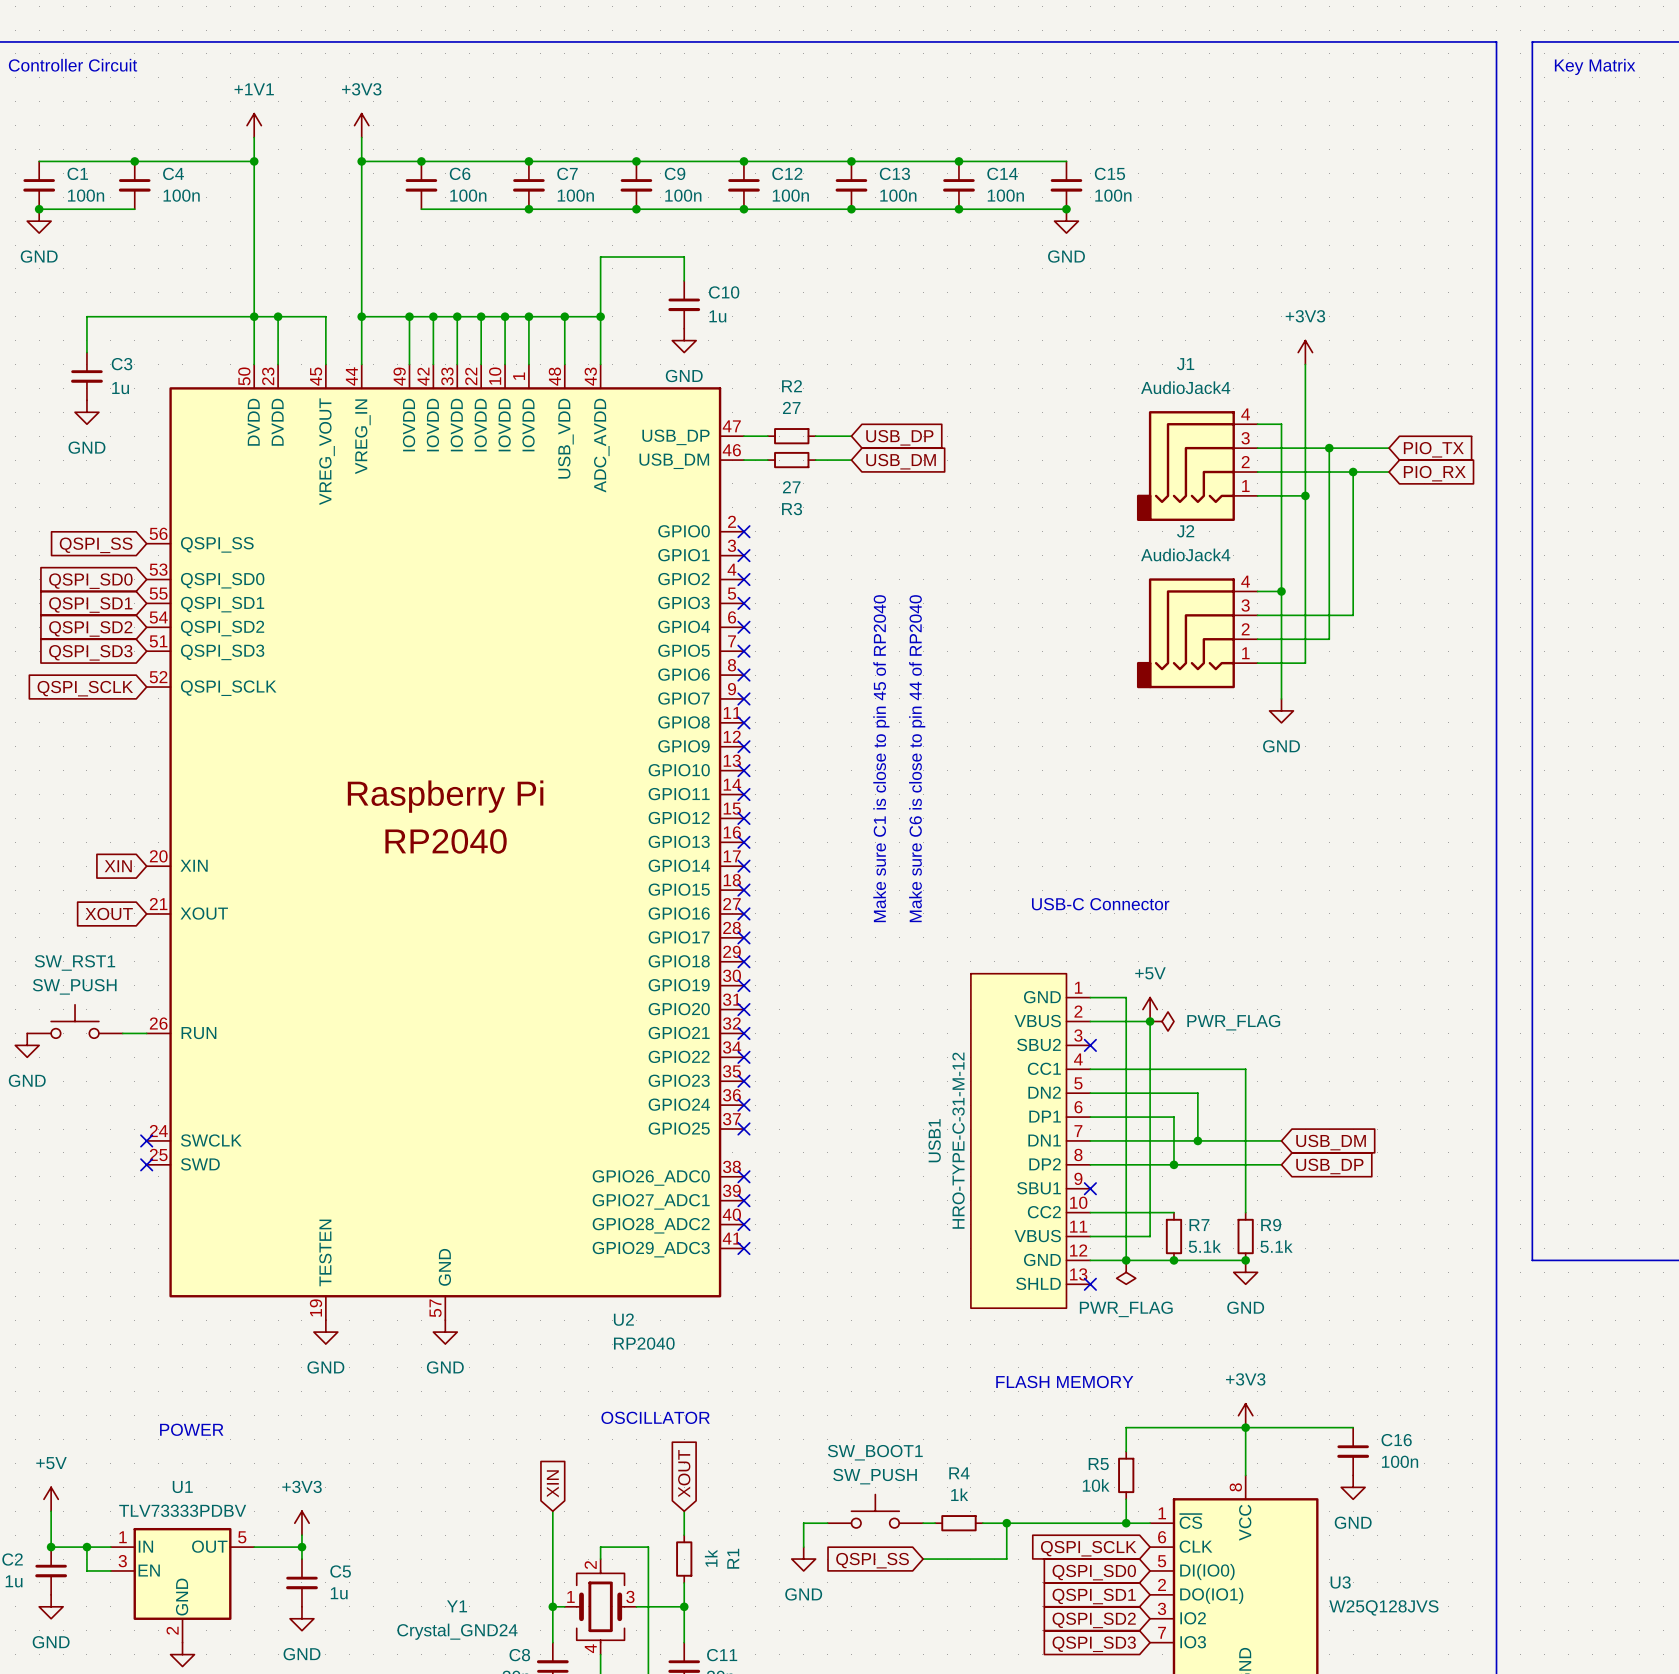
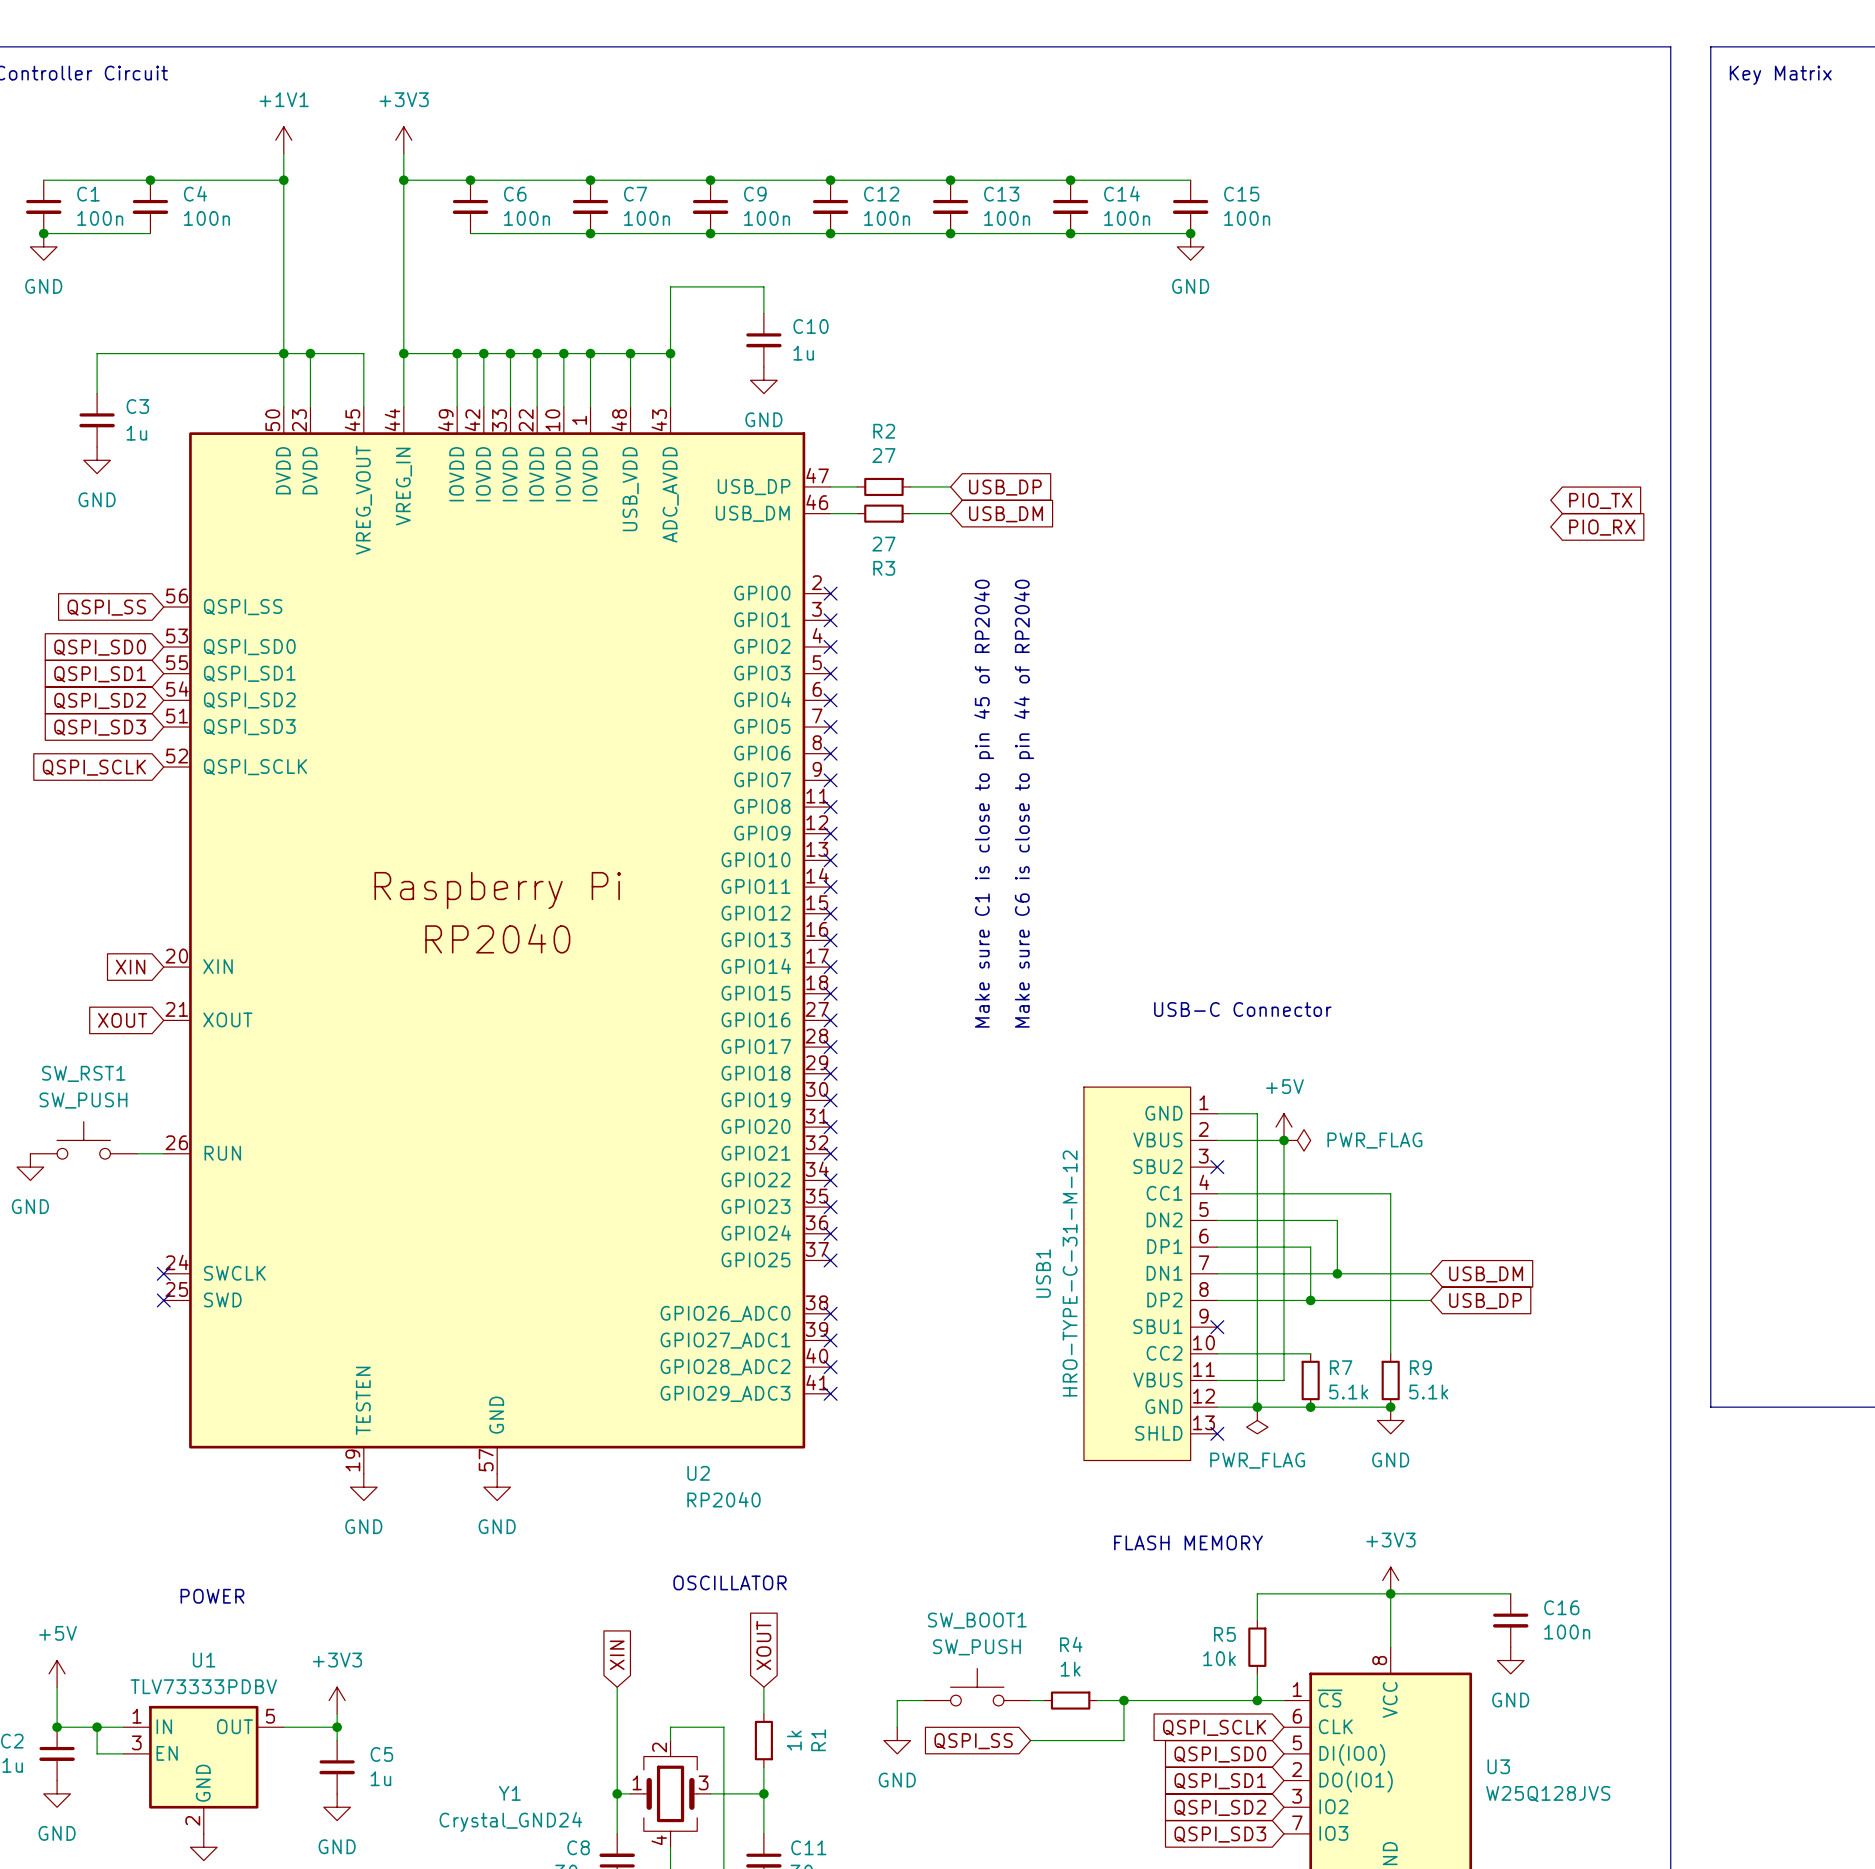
power symbol: +3V3 (1305, 352) -> none
wire: (1305, 364) (1305, 663) (1257, 663) -> none
wire: (1257, 424) (1281, 424) (1281, 698) -> none
wire: (1257, 448) (1389, 448) -> none
wire: (1329, 448) (1329, 639) (1257, 639) -> none
junction: (1329, 448) -> none
J1: AudioJack4 (1197, 466) -> none
wire: (1257, 472) (1389, 472) -> none
wire: (1353, 472) (1353, 615) (1257, 615) -> none
junction: (1353, 472) -> none
wire: (1257, 495) (1305, 495) -> none
junction: (1305, 495) -> none
wire: (1257, 591) (1281, 591) -> none
junction: (1281, 591) -> none
J2: AudioJack4 (1197, 633) -> none
power symbol: GND (1281, 710) -> none

